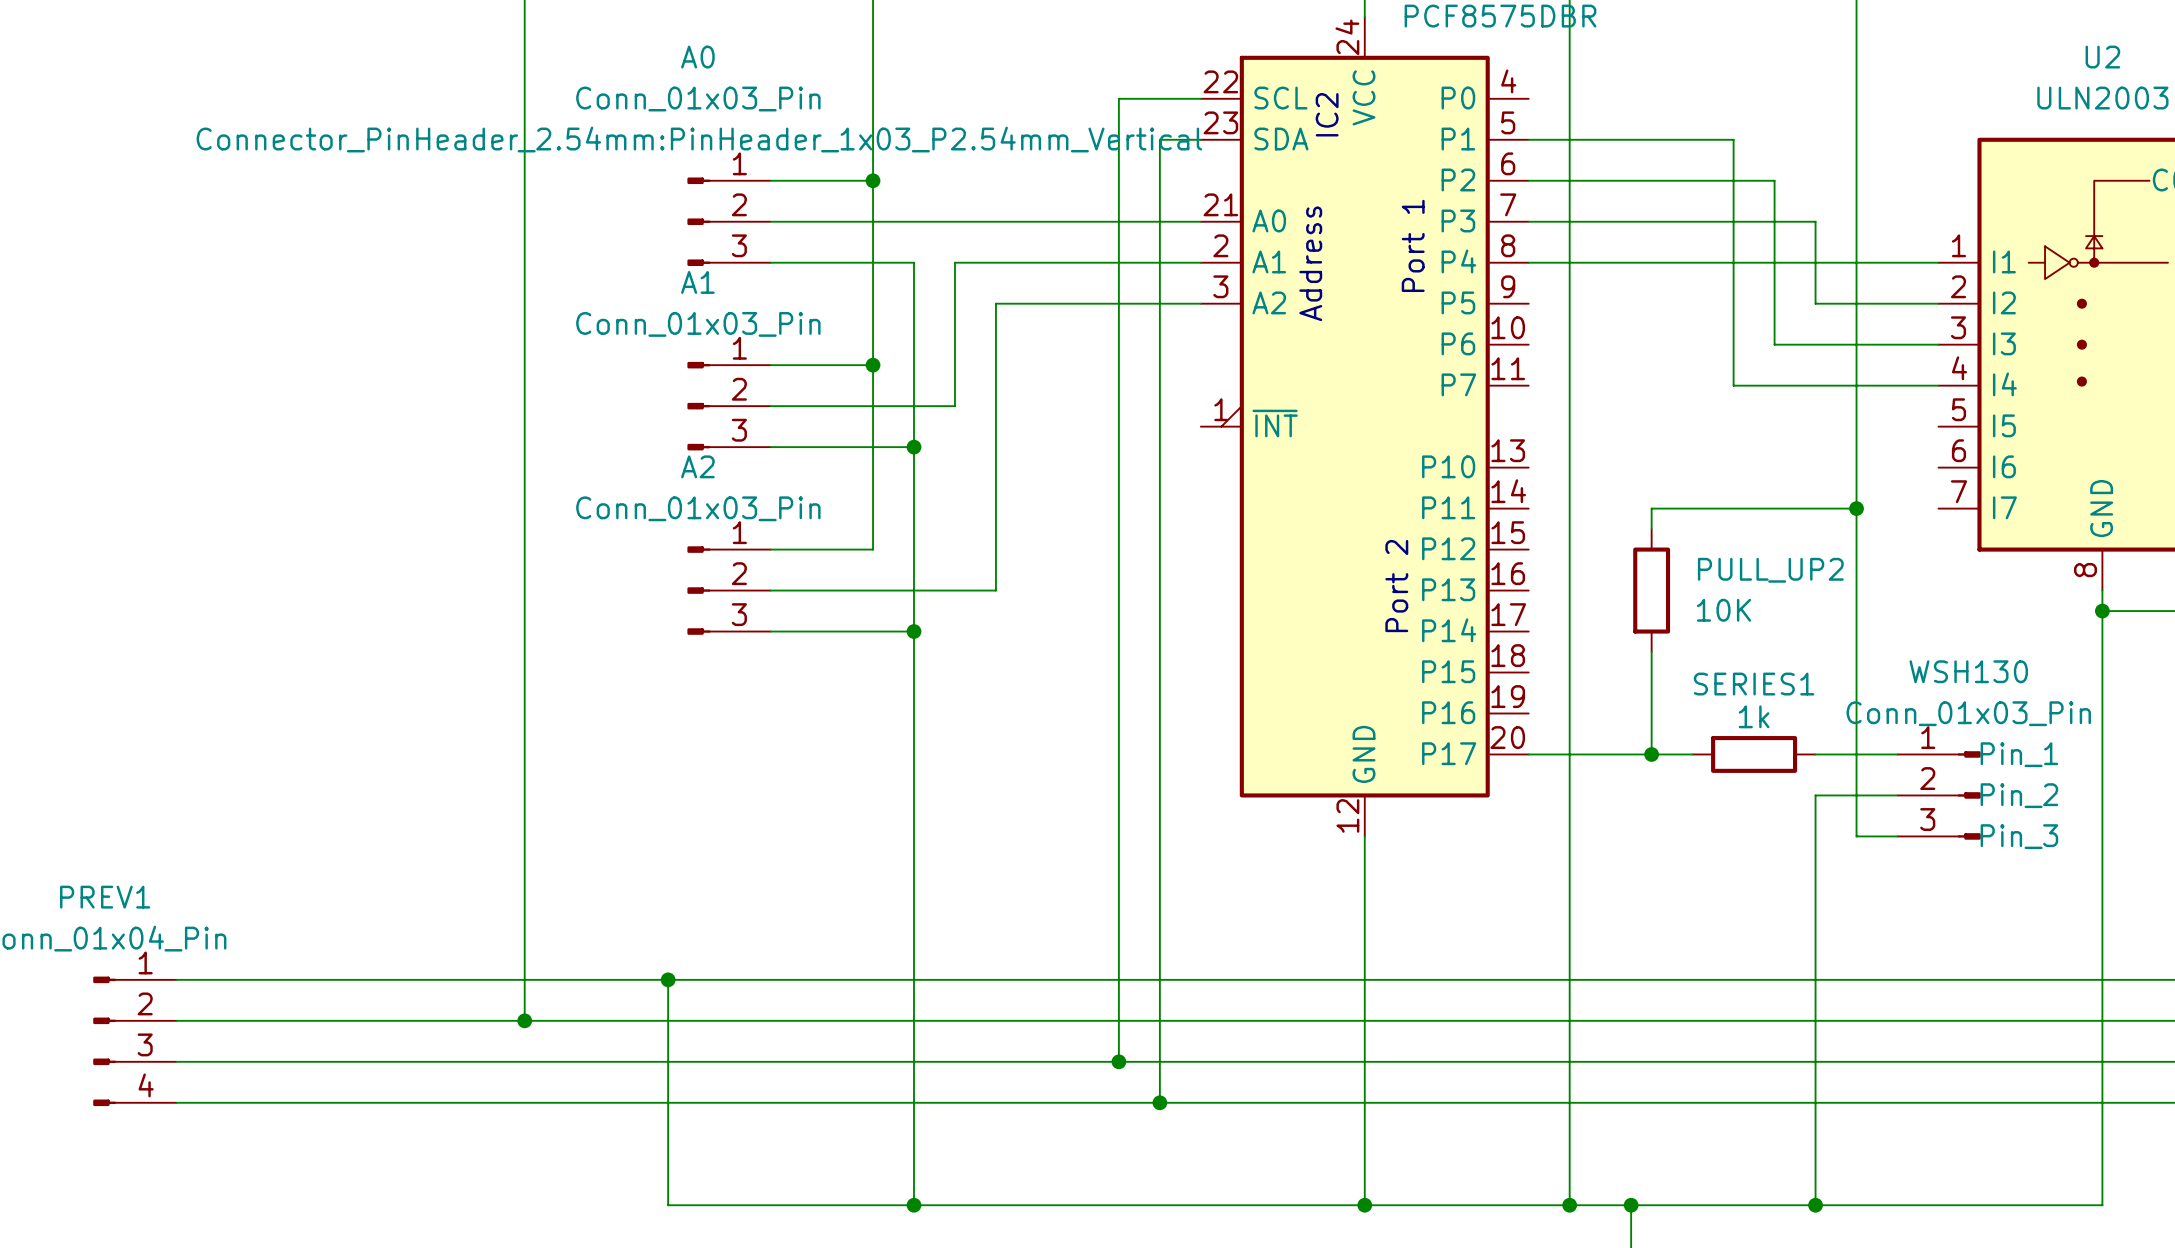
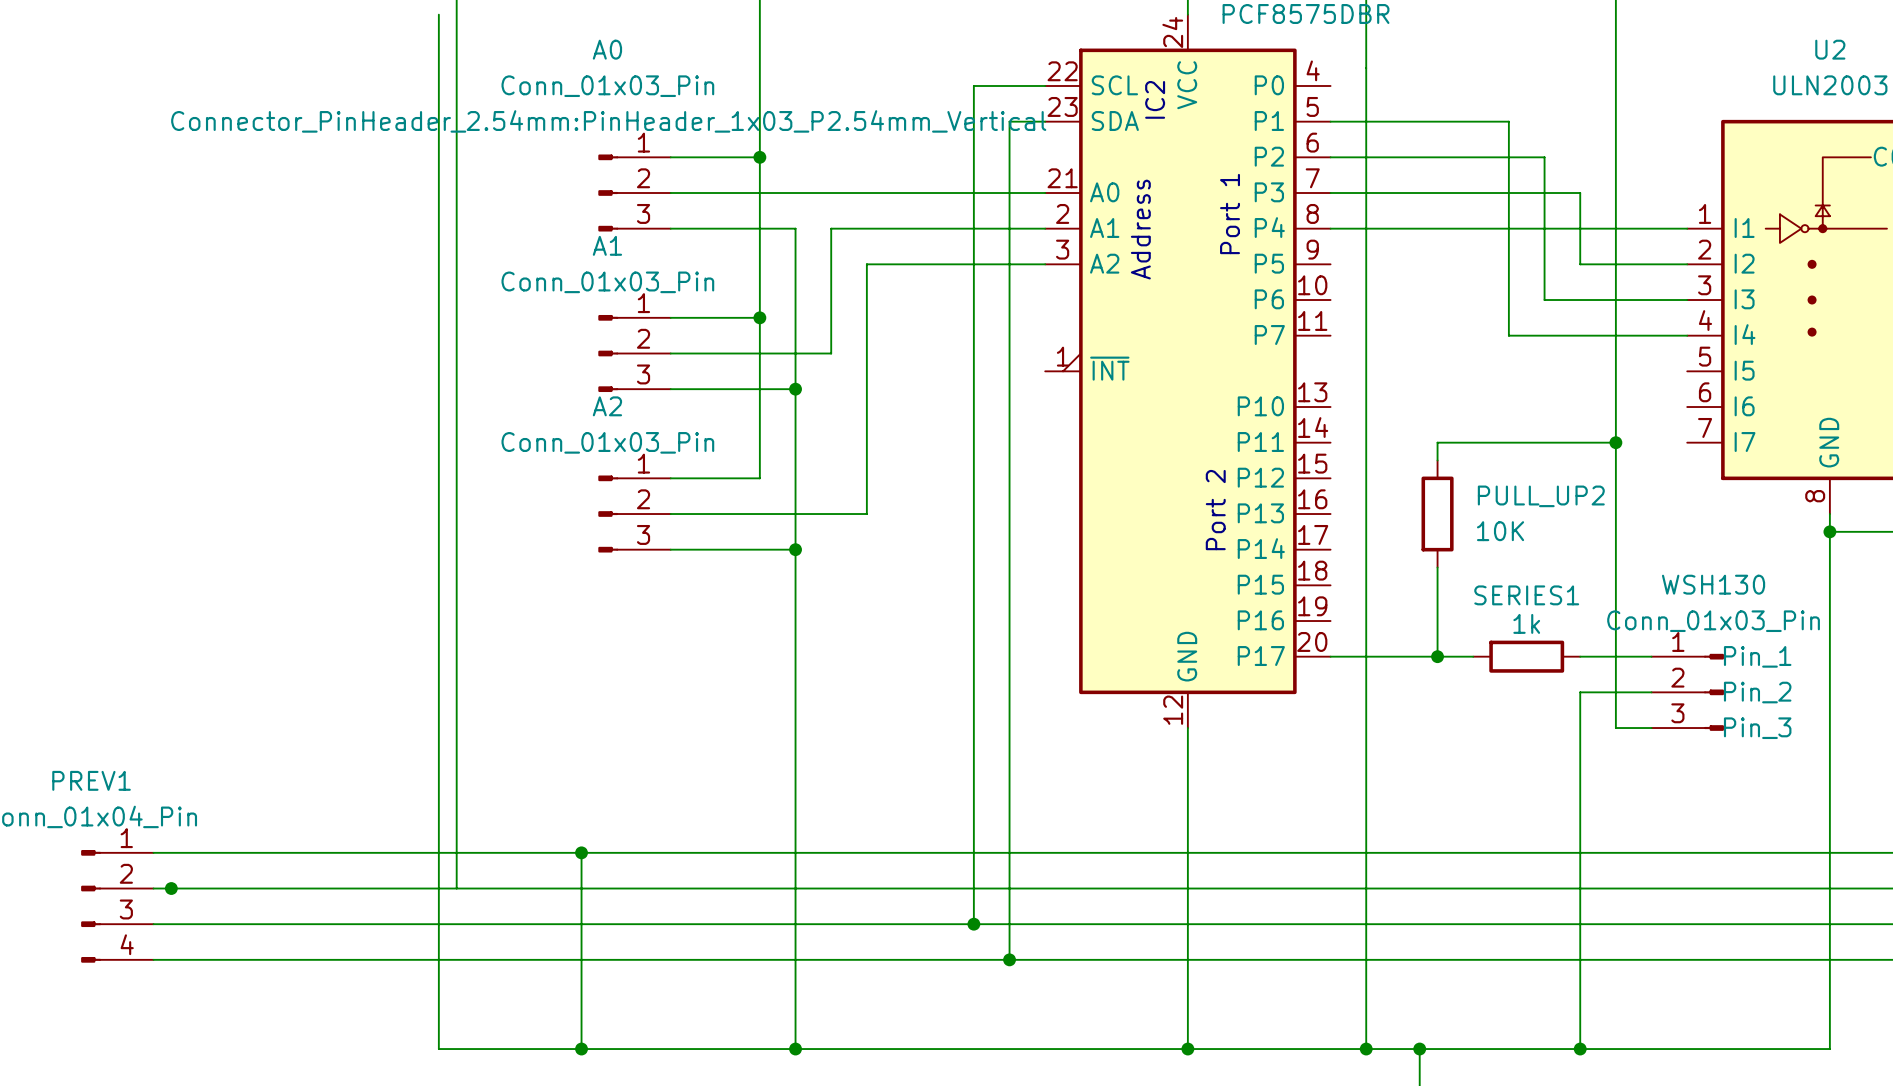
wire: none -> (438, 14) (438, 1049) (581, 1049)
junction: none -> (171, 888)
junction: (524, 1020) -> none
junction: none -> (581, 1049)

